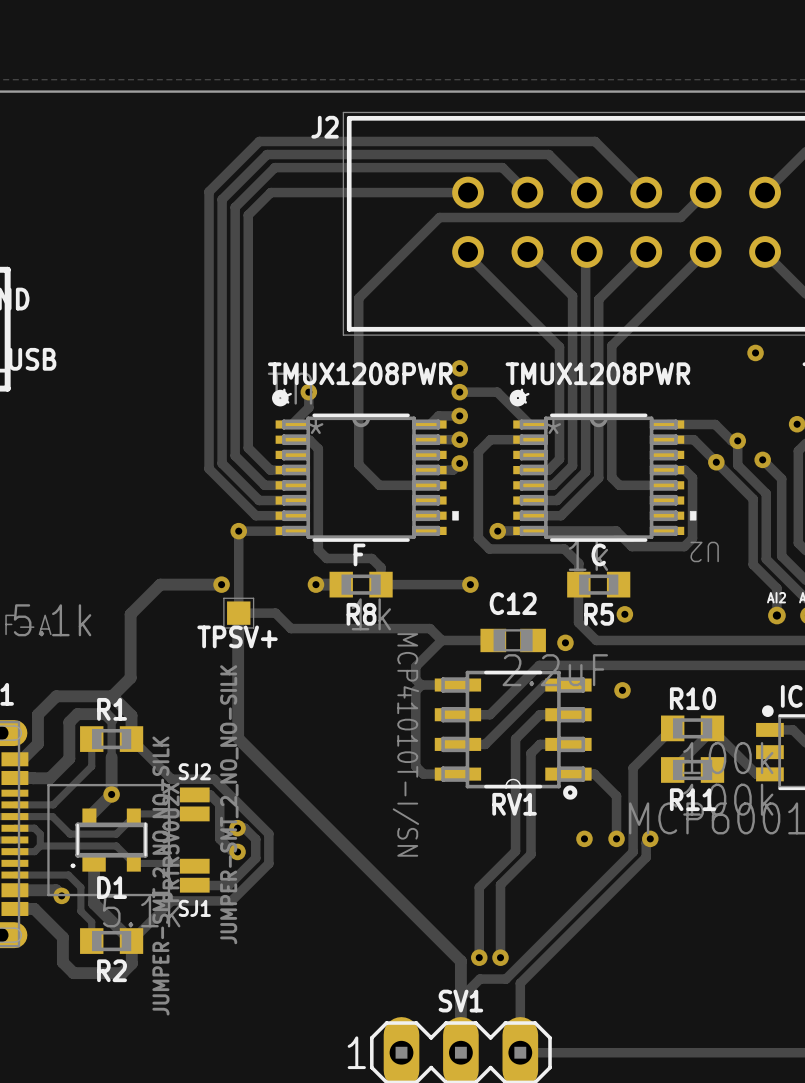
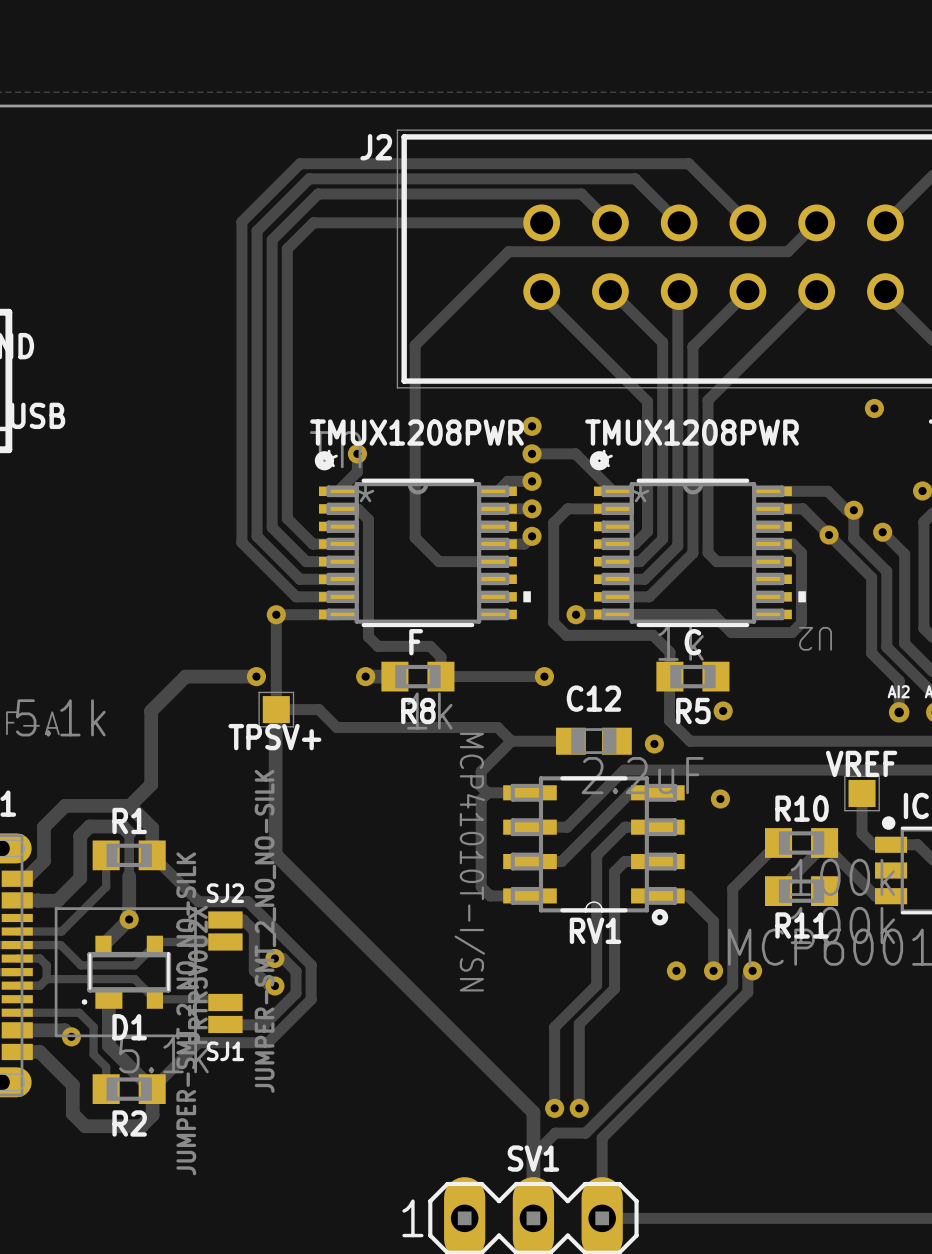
track: none -> (862, 793) (862, 833) (873, 844) (891, 844)
VREF: none -> (862, 793)

